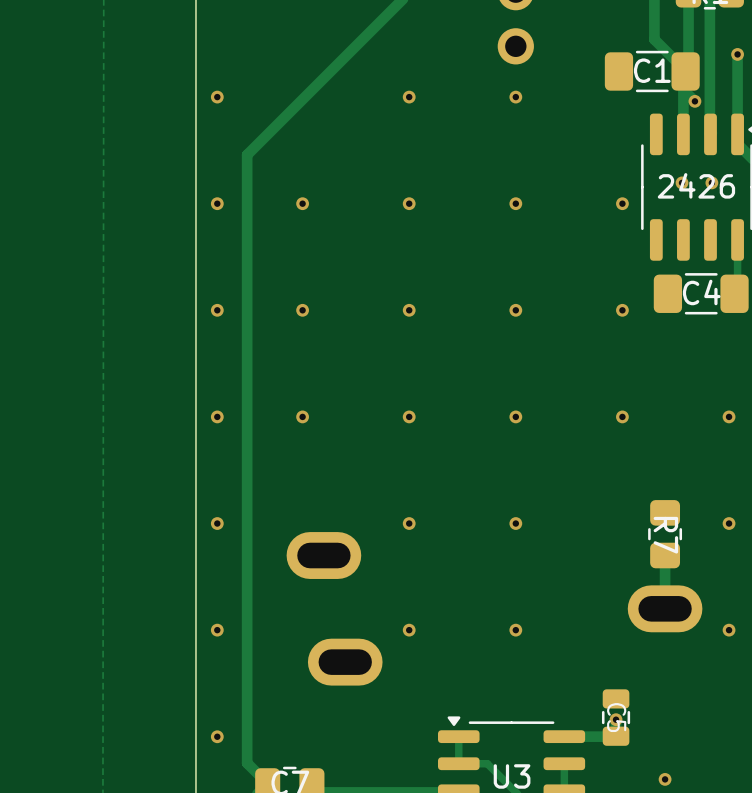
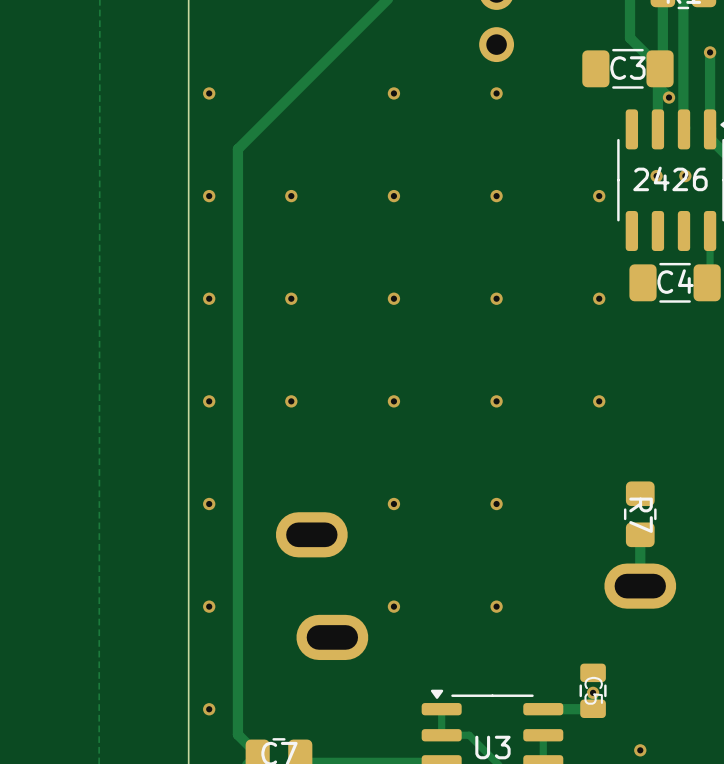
C1 name: C1 (652, 70) -> C3 (627, 68)
via: (729, 416) -> none
via: (729, 523) -> none
via: (729, 630) -> none

